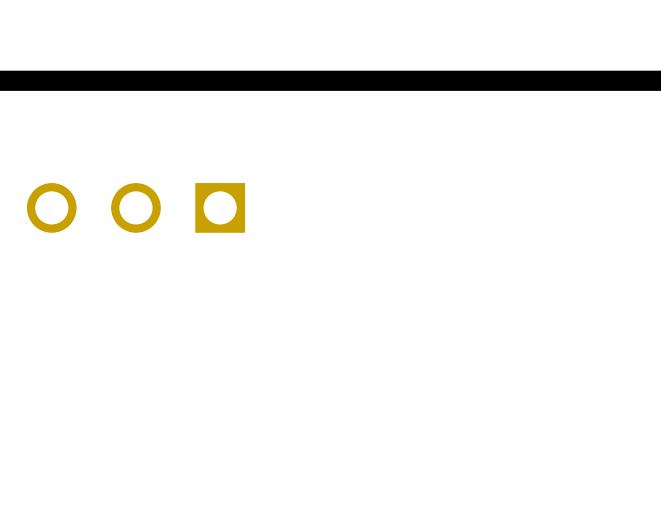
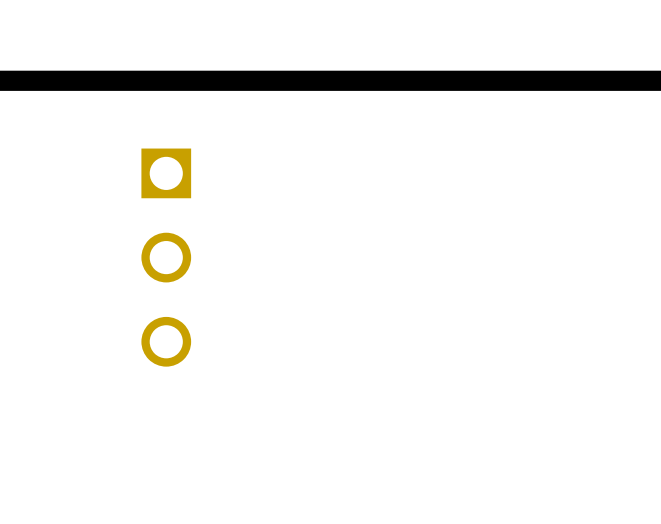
part rotation: 0° (135, 207) -> 90° counterclockwise (166, 257)

